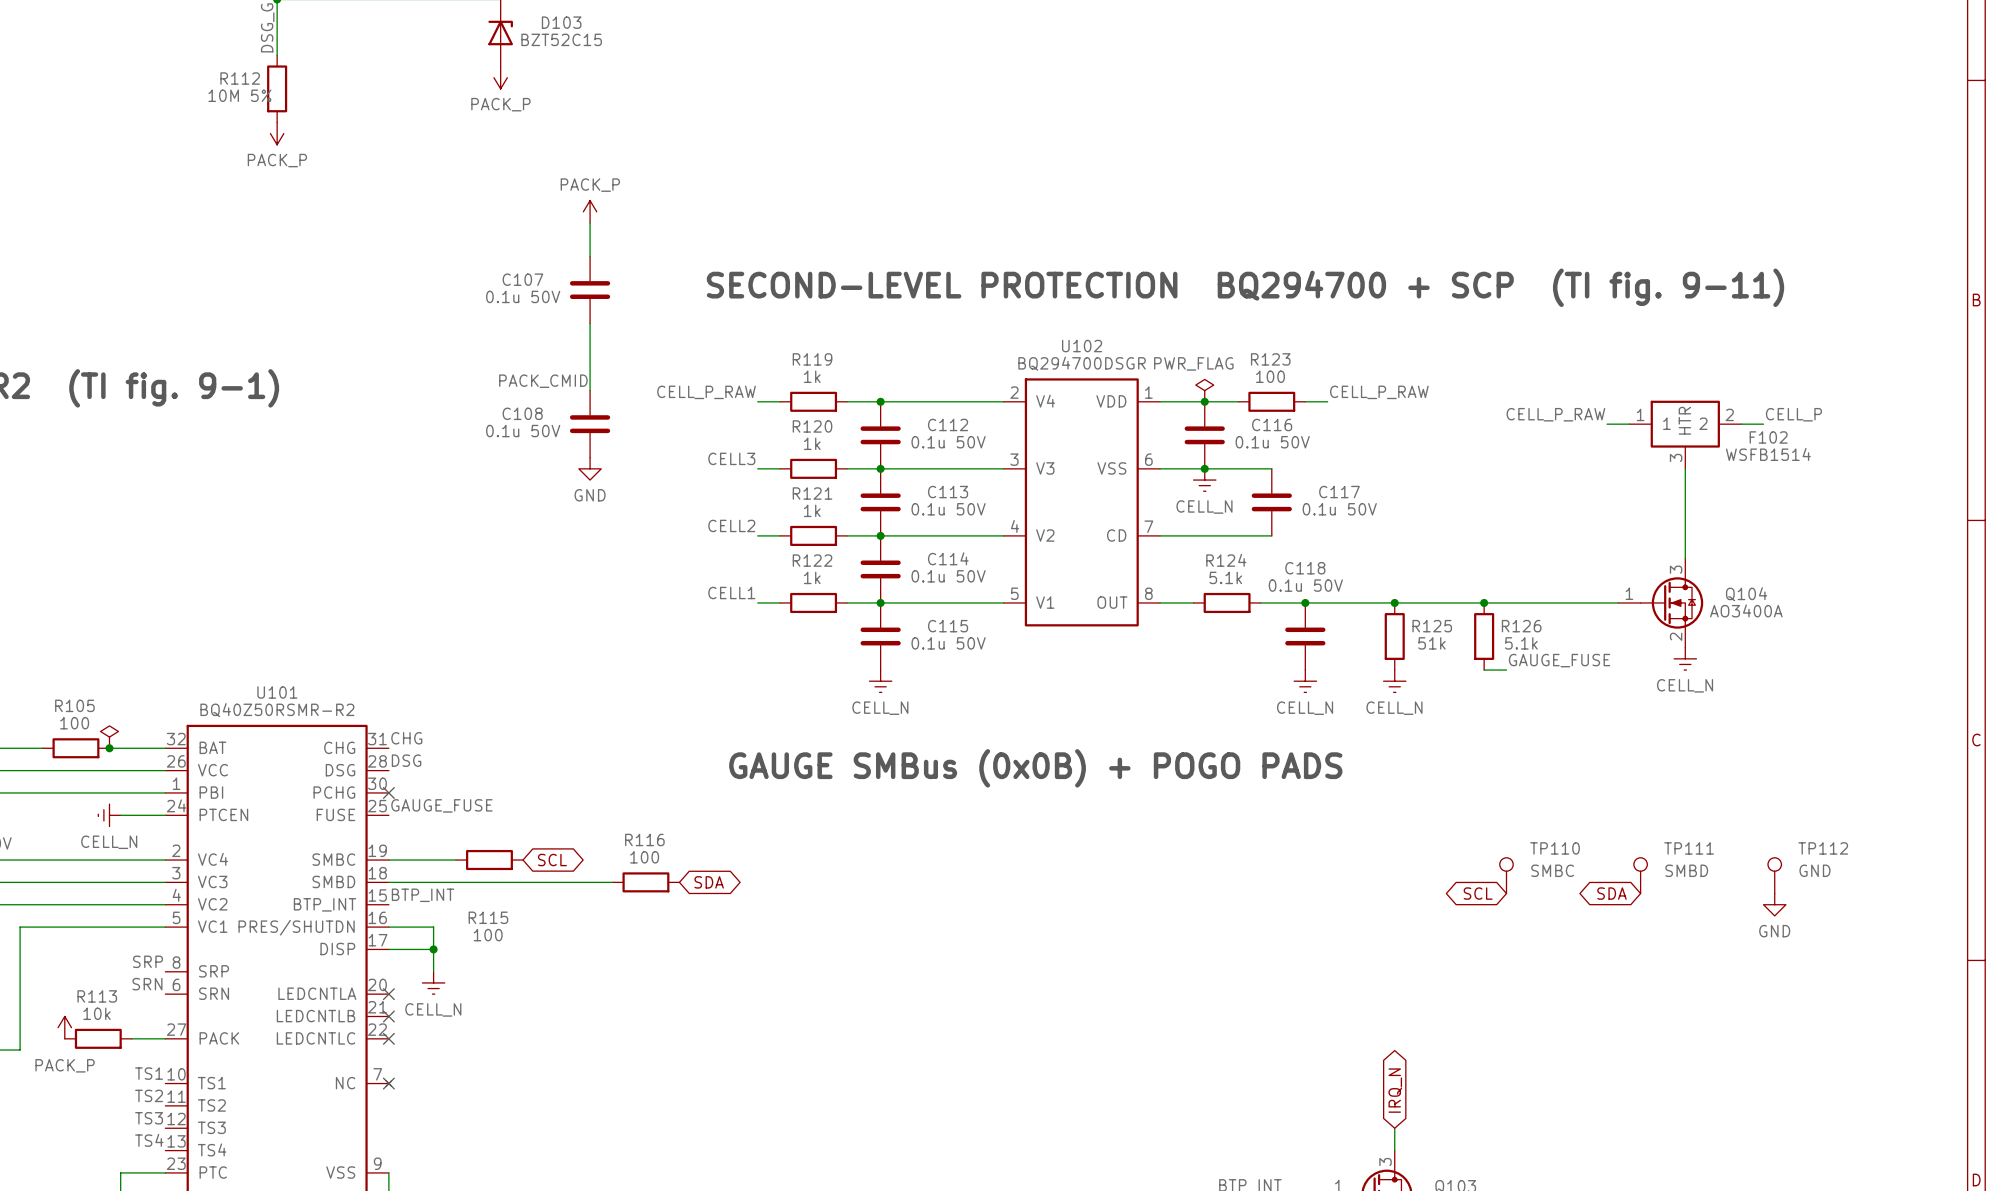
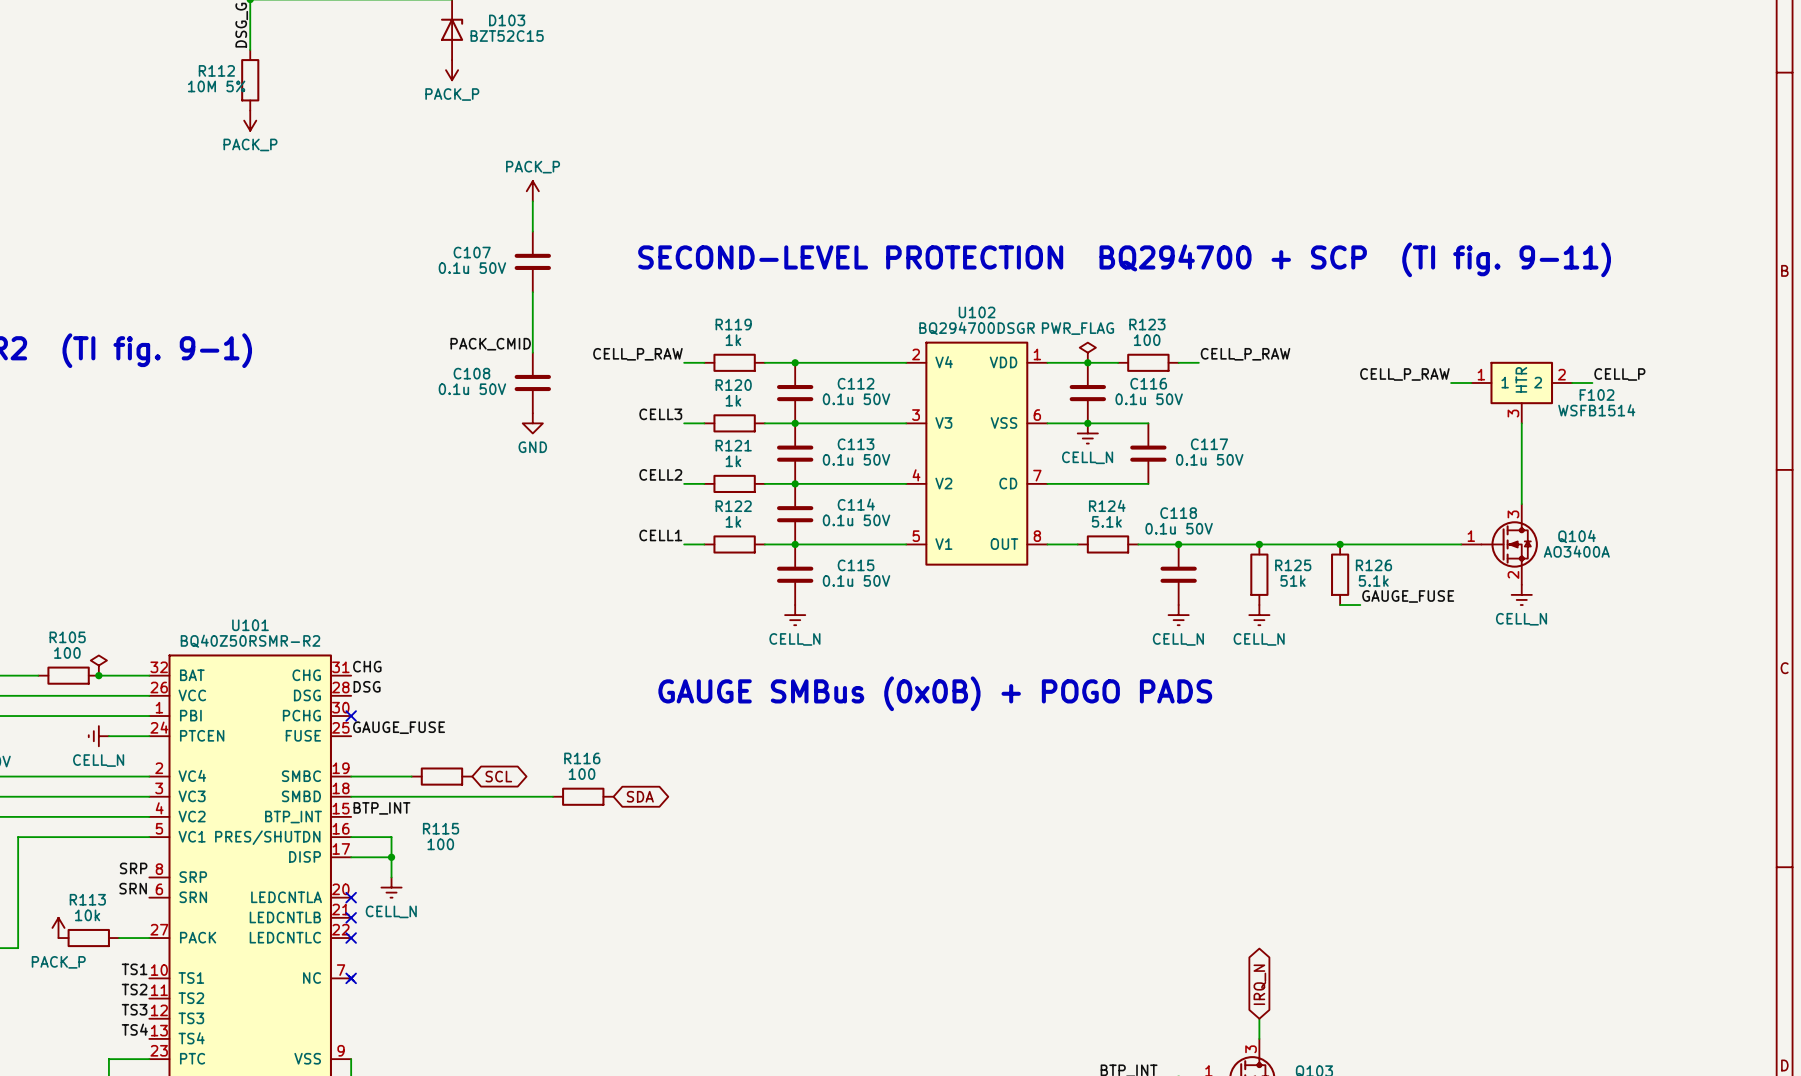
TP110: SMBC (1506, 875) -> none
TP111: SMBD (1640, 875) -> none
TP112: GND (1774, 875) -> none
global label: SCL (1478, 893) -> none
global label: SDA (1611, 893) -> none
power symbol: GND (1774, 904) -> none

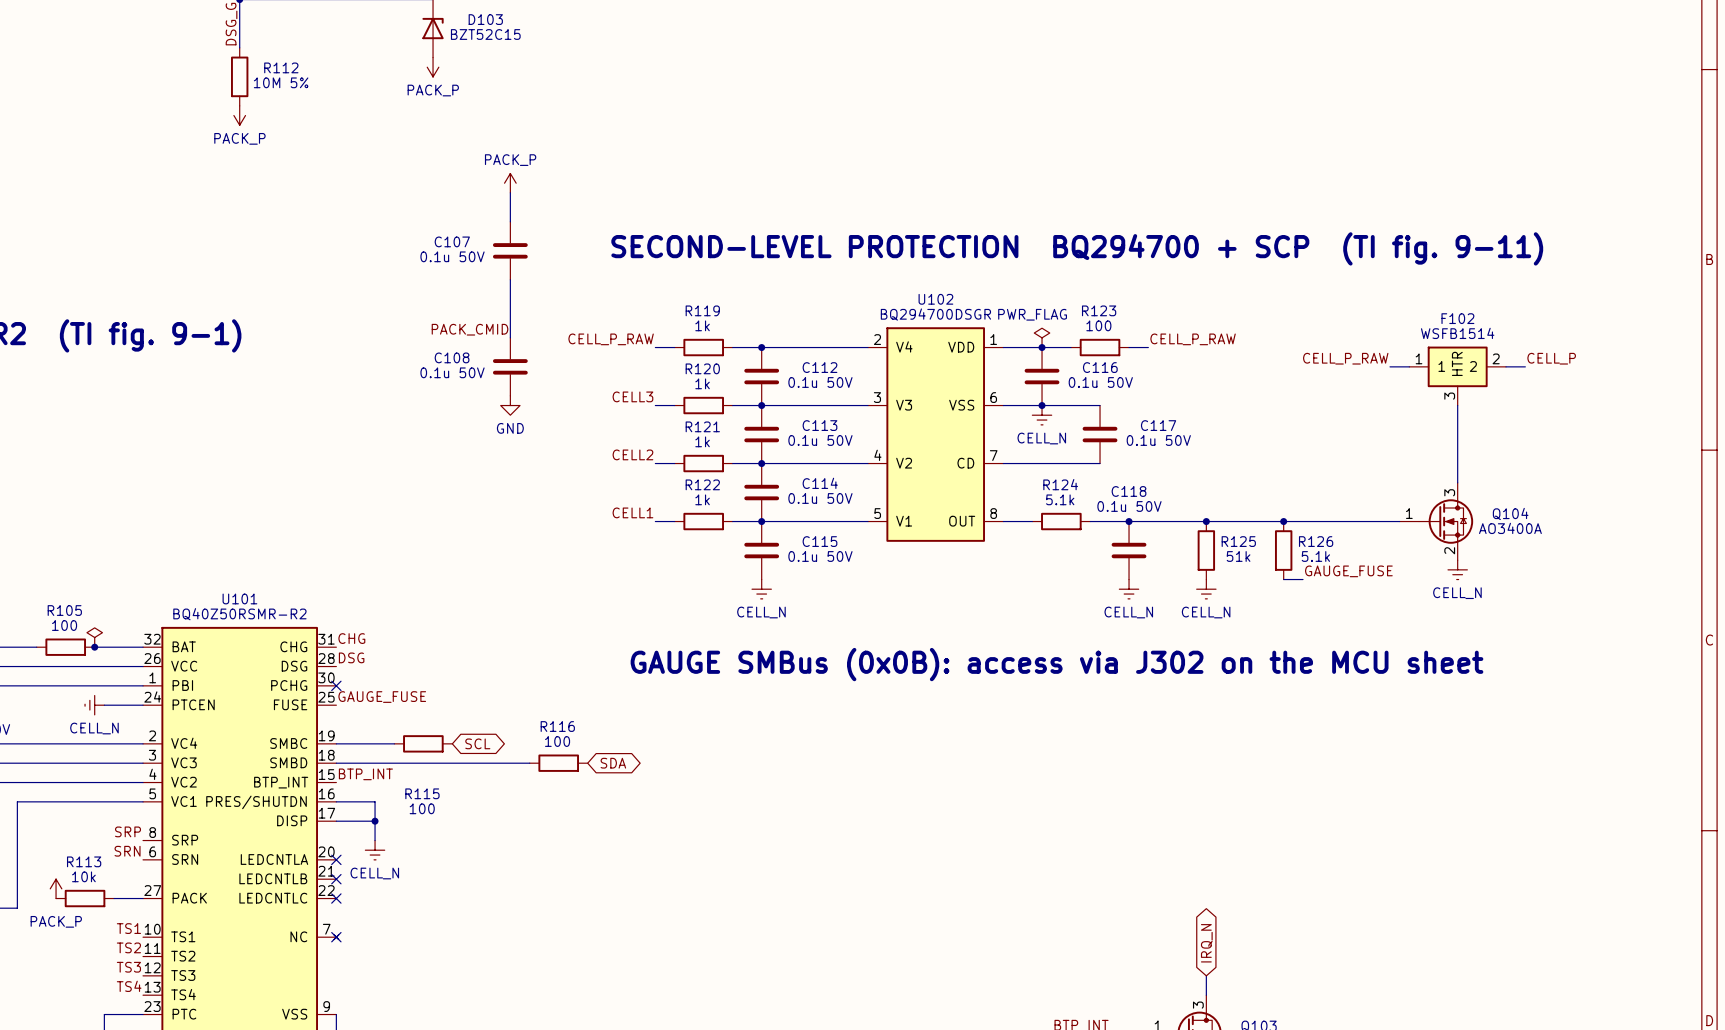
R112 name position: R112 (216, 70) -> R112 (281, 67)
R112 value position: 10M 5% (216, 86) -> 10M 5% (281, 82)
F102 name position: F102 (1597, 395) -> F102 (1457, 318)
F102 value position: WSFB1514 (1596, 410) -> WSFB1514 (1457, 333)
text: GAUGE SMBus (0x0B) + POGO PADS (935, 693) -> GAUGE SMBus (0x0B): access via J302 on the MCU sheet (1056, 664)

